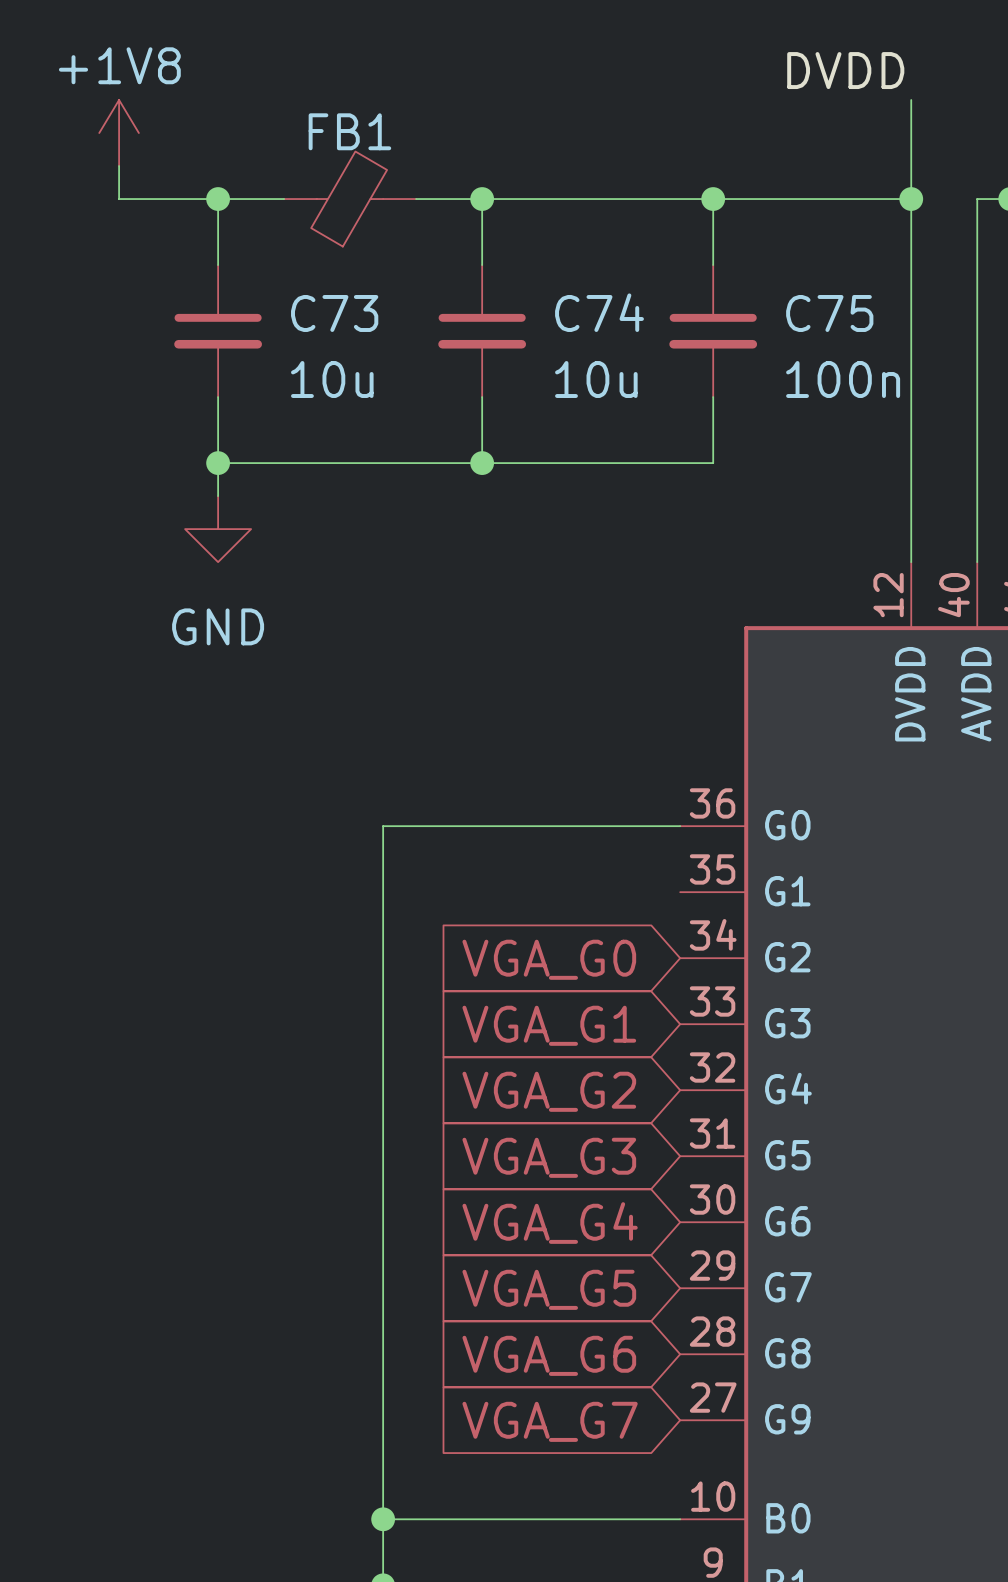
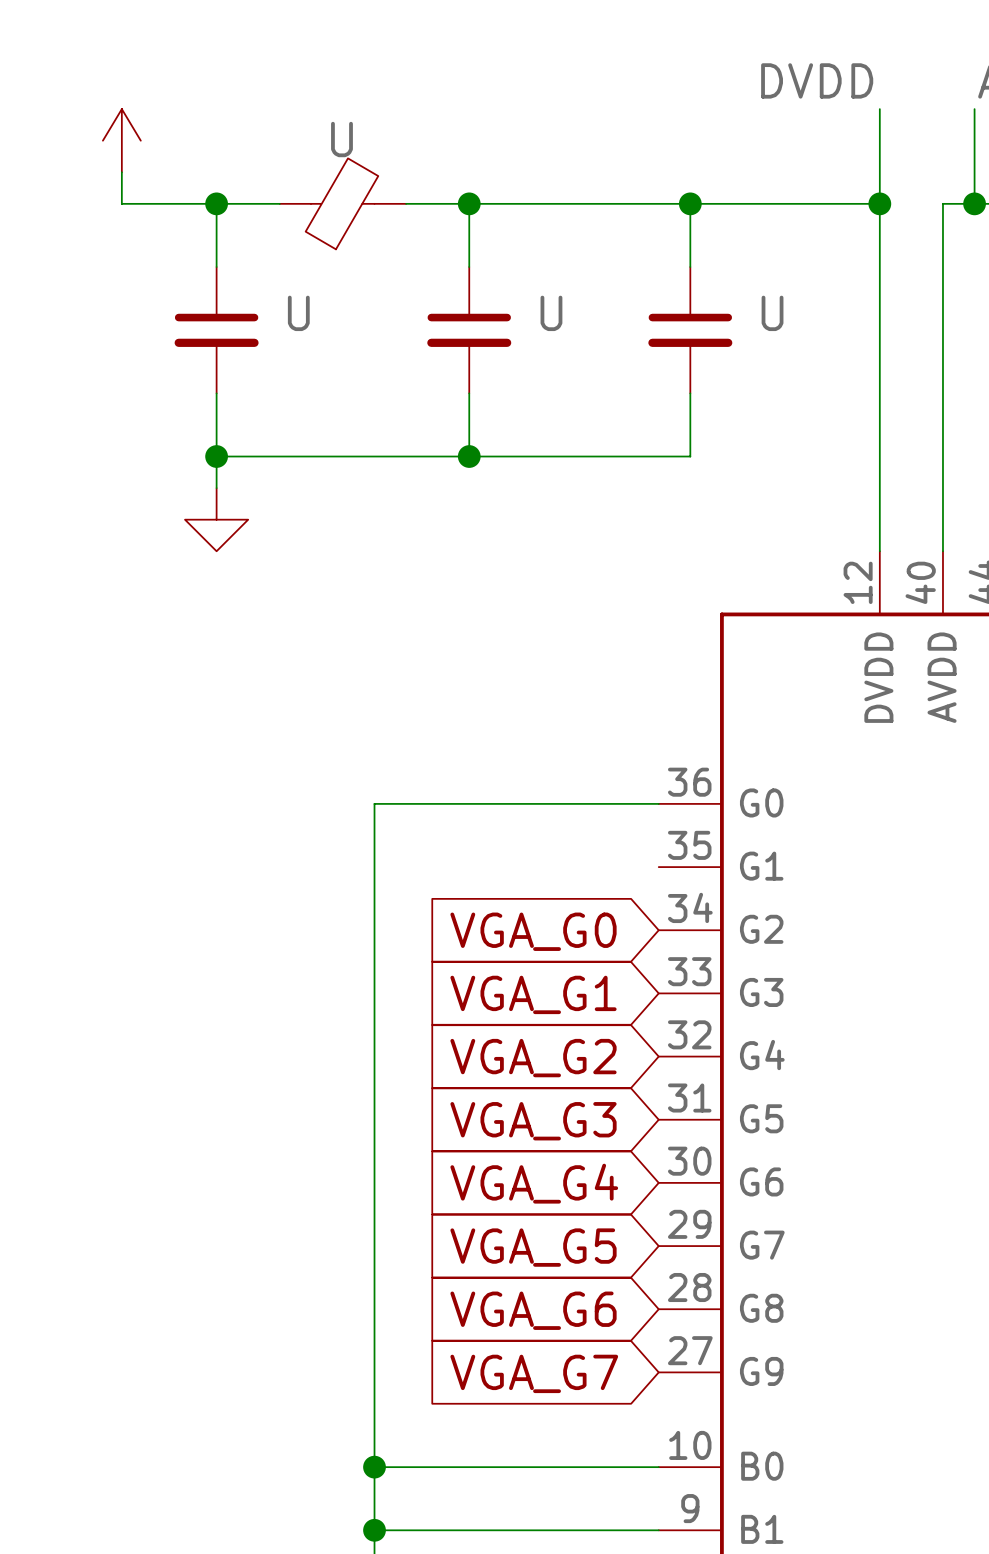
power symbol text: +1V8 (119, 65) -> none
FB1 name: FB1 (349, 131) -> U (341, 139)
C74 name: C74 (599, 312) -> U (551, 313)
C73 name: C73 (334, 313) -> U (298, 313)
C75 name: C75 (829, 313) -> U (772, 313)
C73 value: 10u (332, 379) -> none
C74 value: 10u (596, 379) -> none
C75 value: 100n (843, 379) -> none
power symbol text: GND (218, 626) -> none

